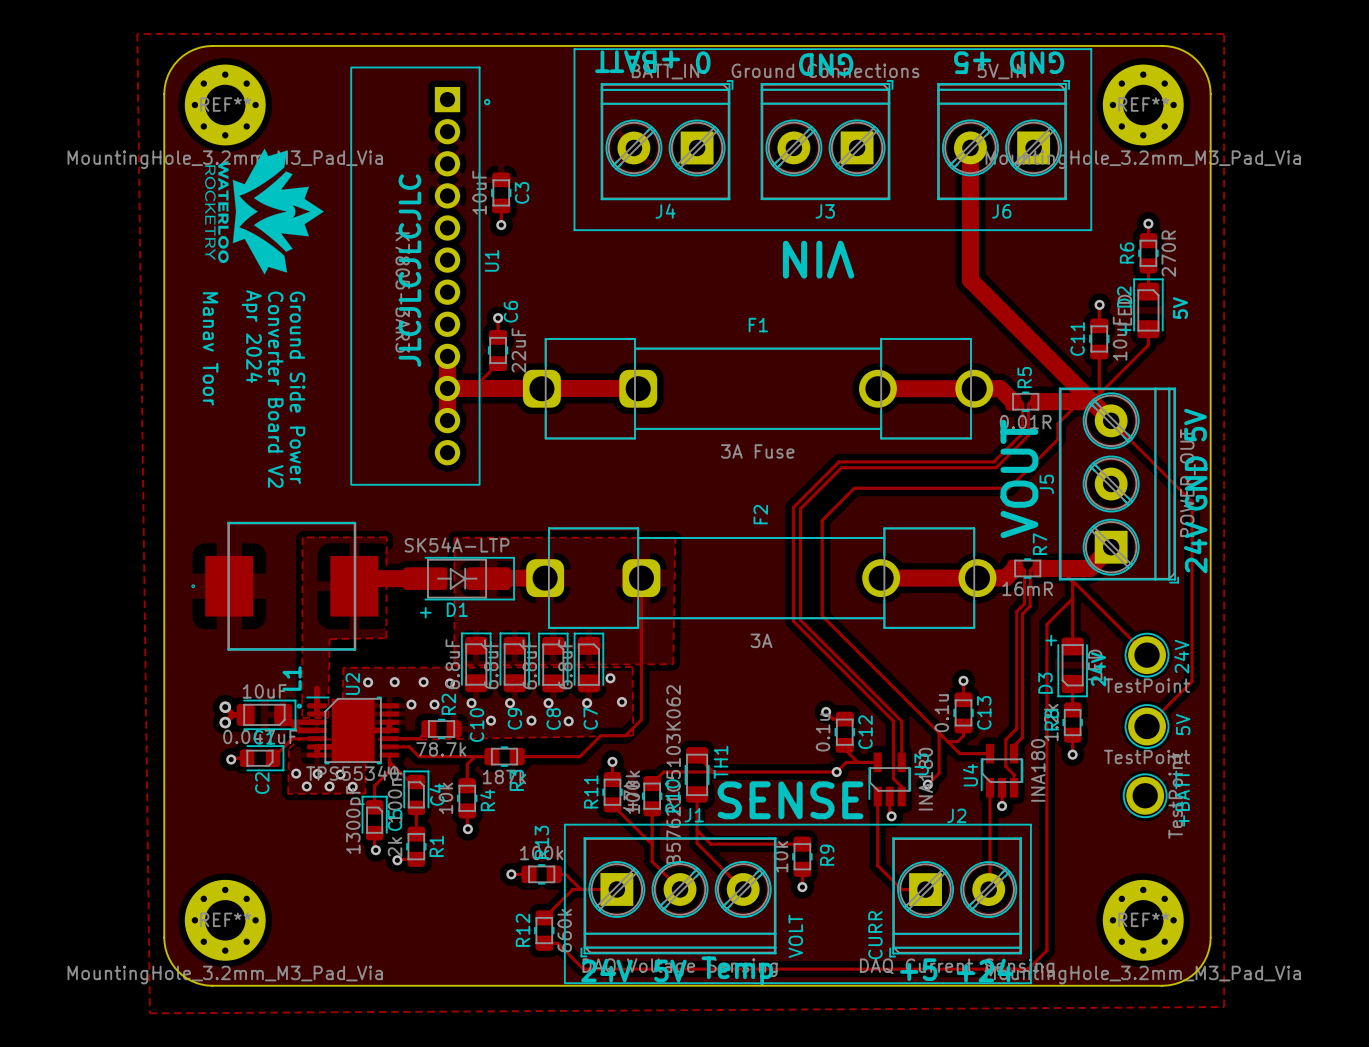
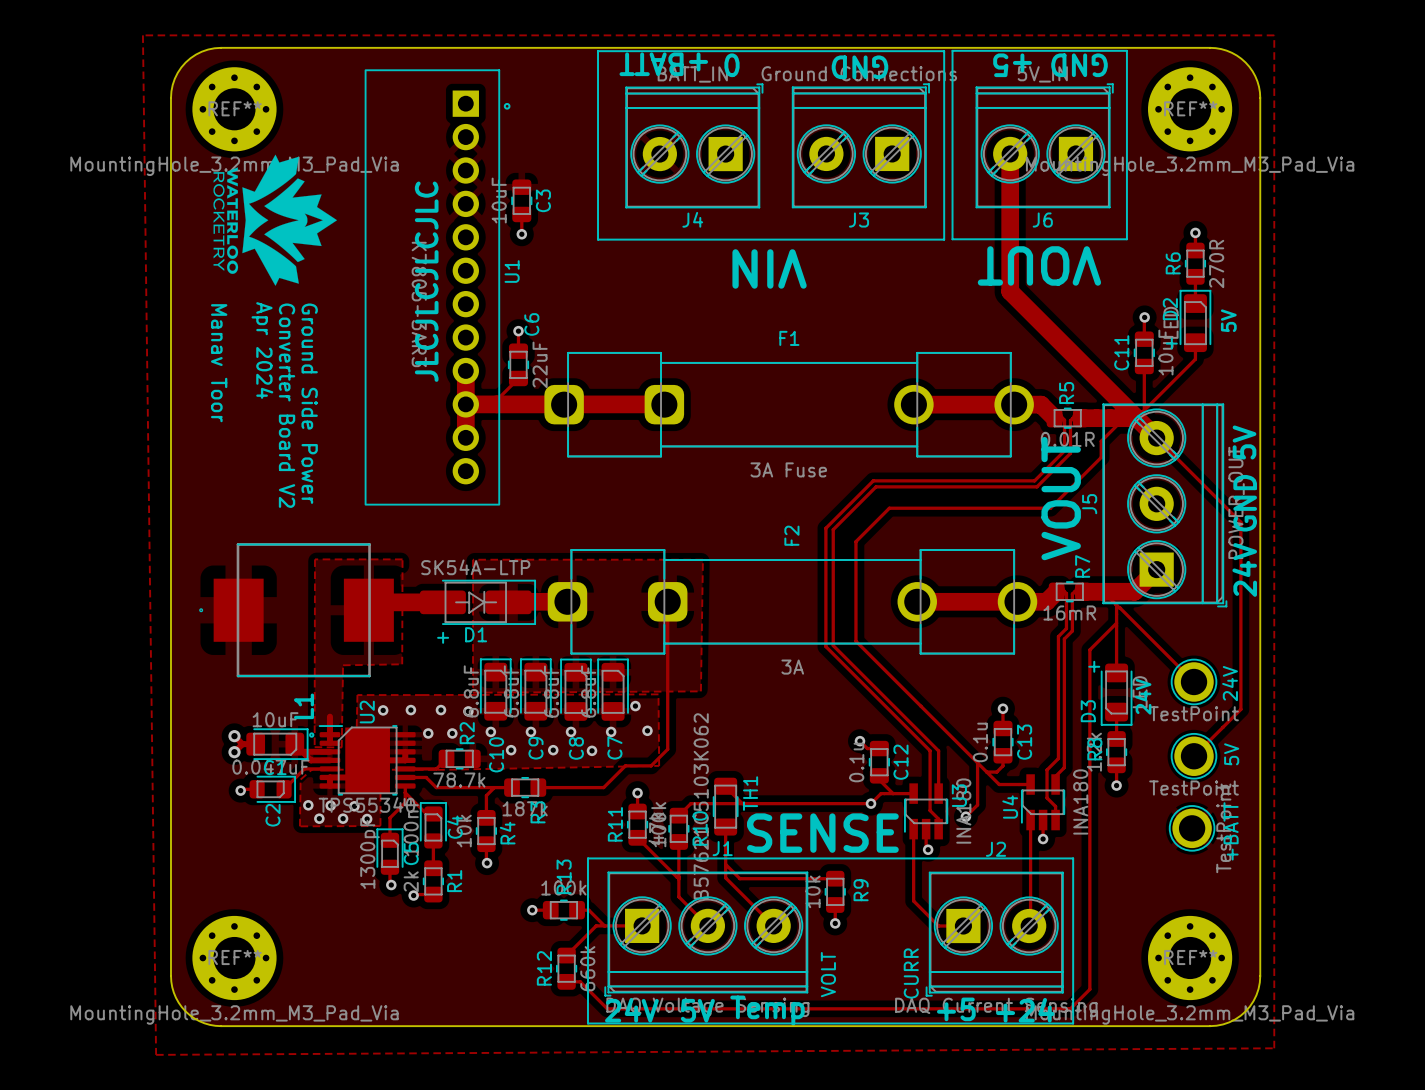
line: none -> (952, 50) (1126, 50) (1126, 239) (952, 239) (952, 50)
line: (907, 49) (1091, 49) (1091, 230) (907, 230) -> (944, 51) (944, 239)
text: none -> VOUT (1039, 265)
text position: VIN (818, 259) -> VIN (769, 268)

